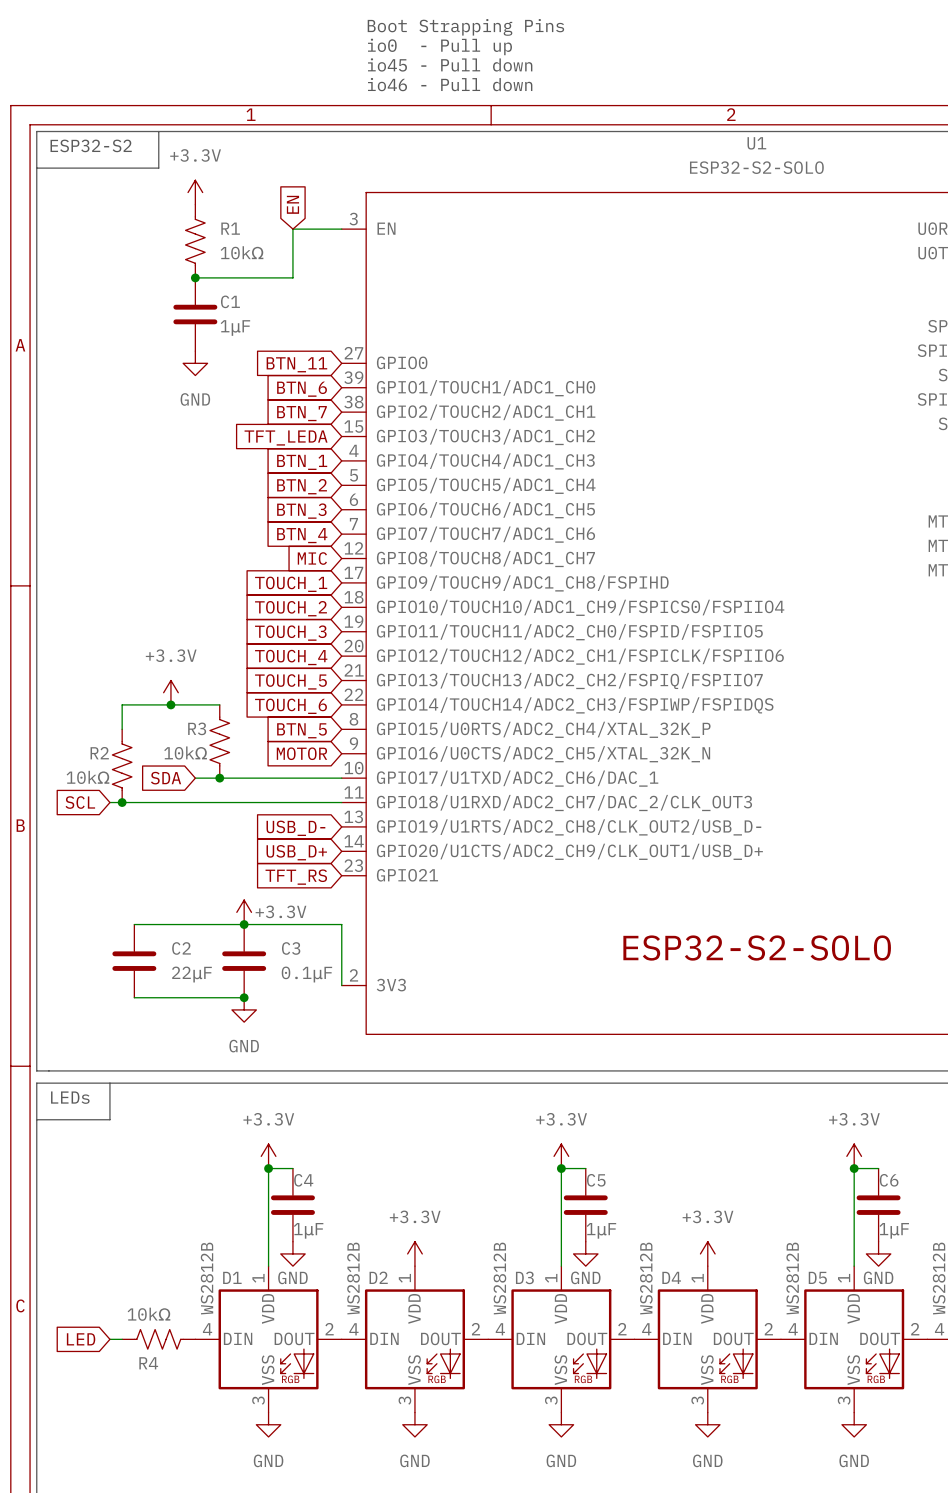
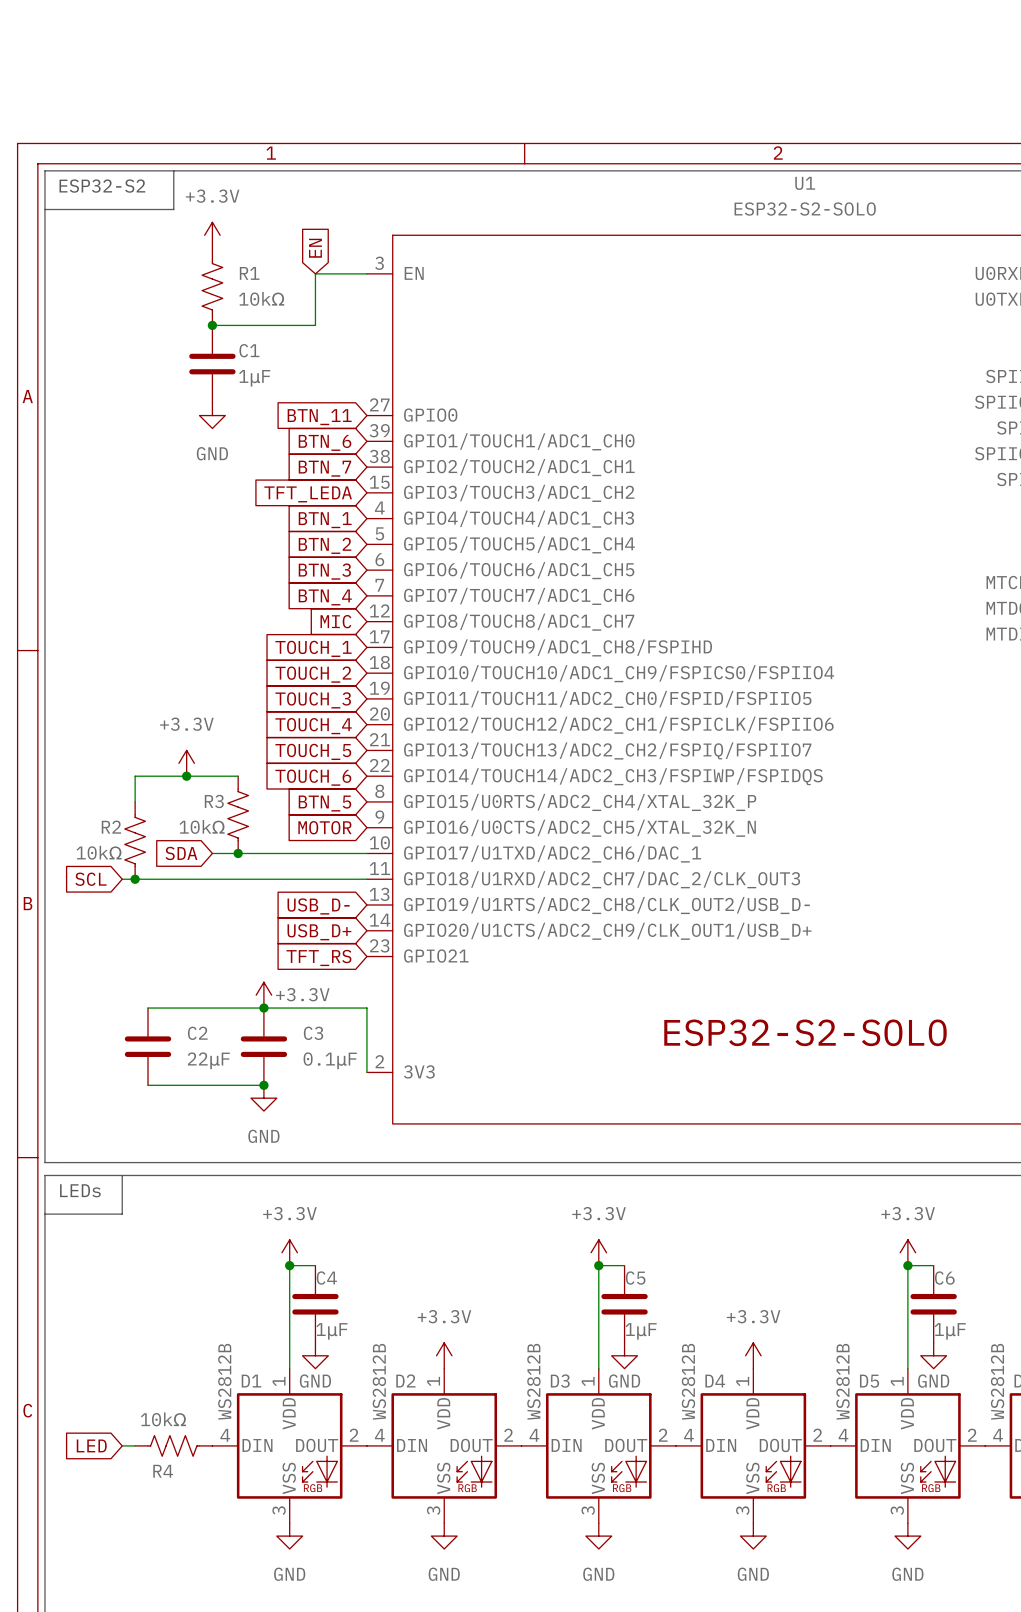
text: Boot Strapping Pins (465, 27) -> none
text: io0 - Pull up (439, 46) -> none
text: io45 - Pull down (450, 64) -> none
text: io46 - Pull down (450, 84) -> none

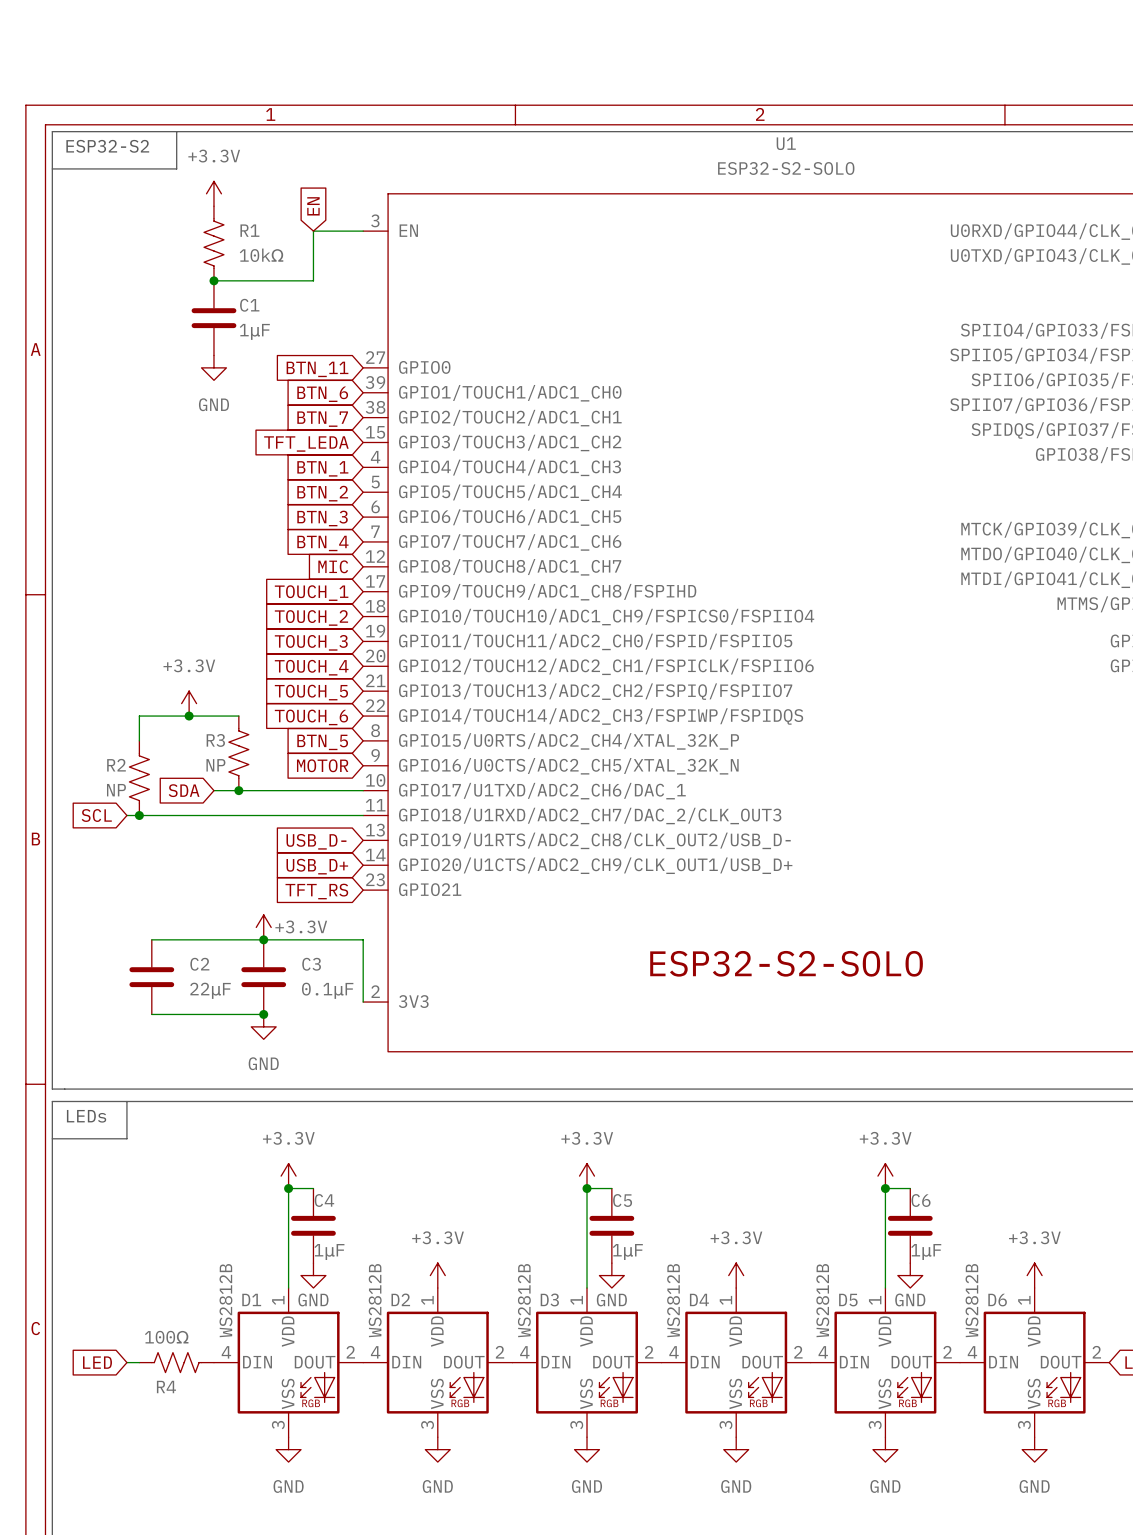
R3 value: 10kΩ (202, 826) -> NP (215, 765)
R2 value: 10kΩ (99, 852) -> NP (116, 790)
R4 value: 10kΩ (163, 1419) -> 100Ω (166, 1337)

